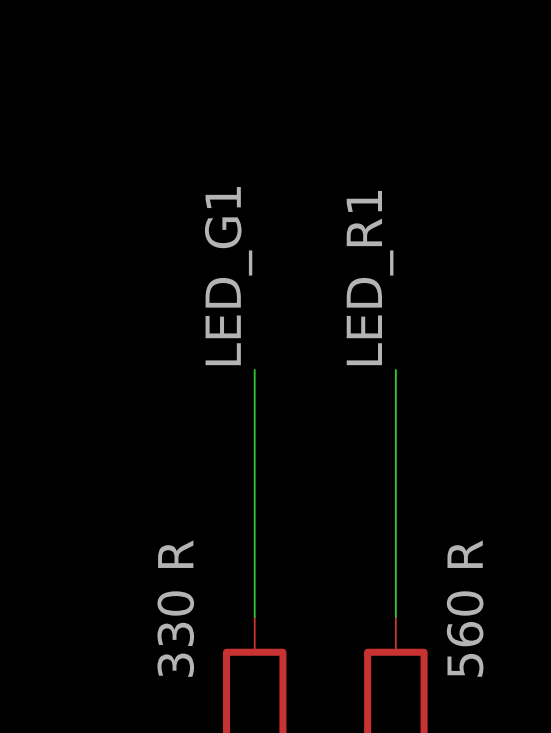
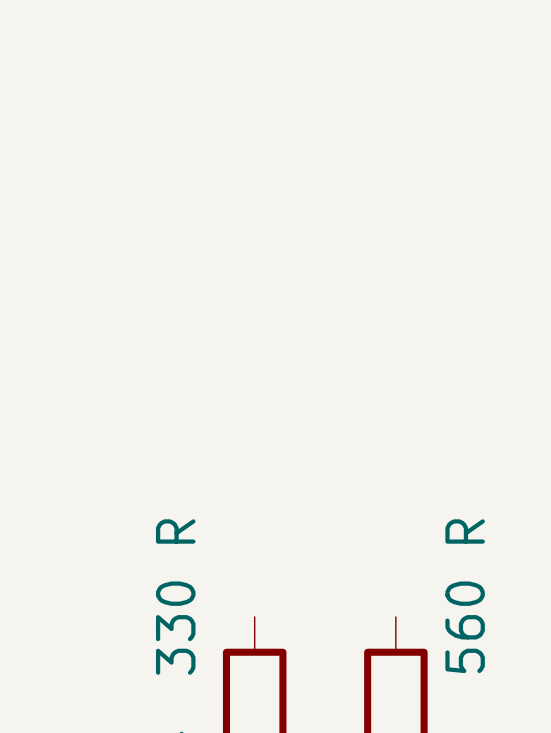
label: LED_G1 (228, 276) -> none
label: LED_R1 (370, 278) -> none
wire: (254, 369) (254, 616) -> none
wire: (395, 369) (395, 616) -> none

